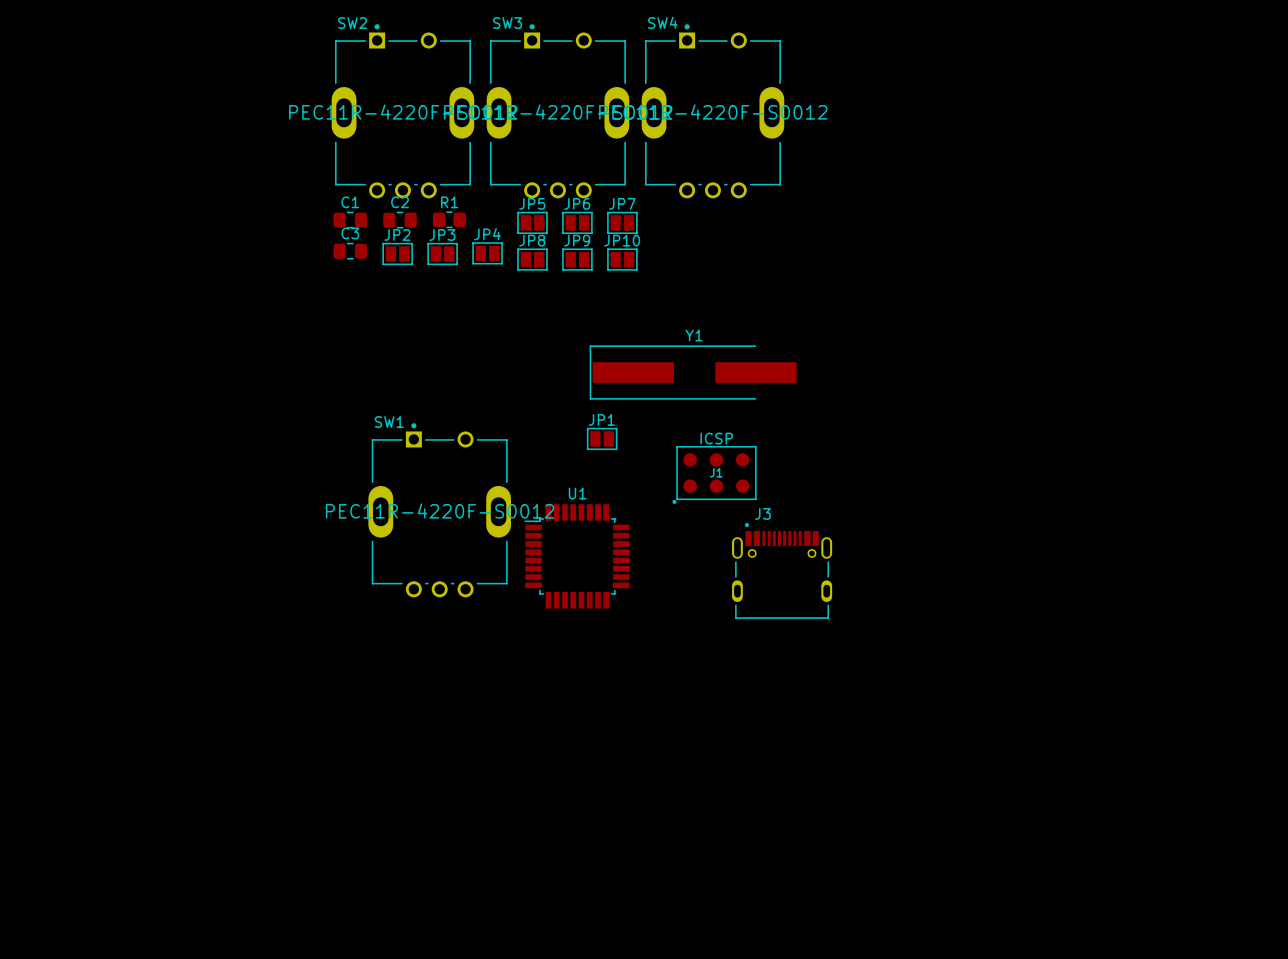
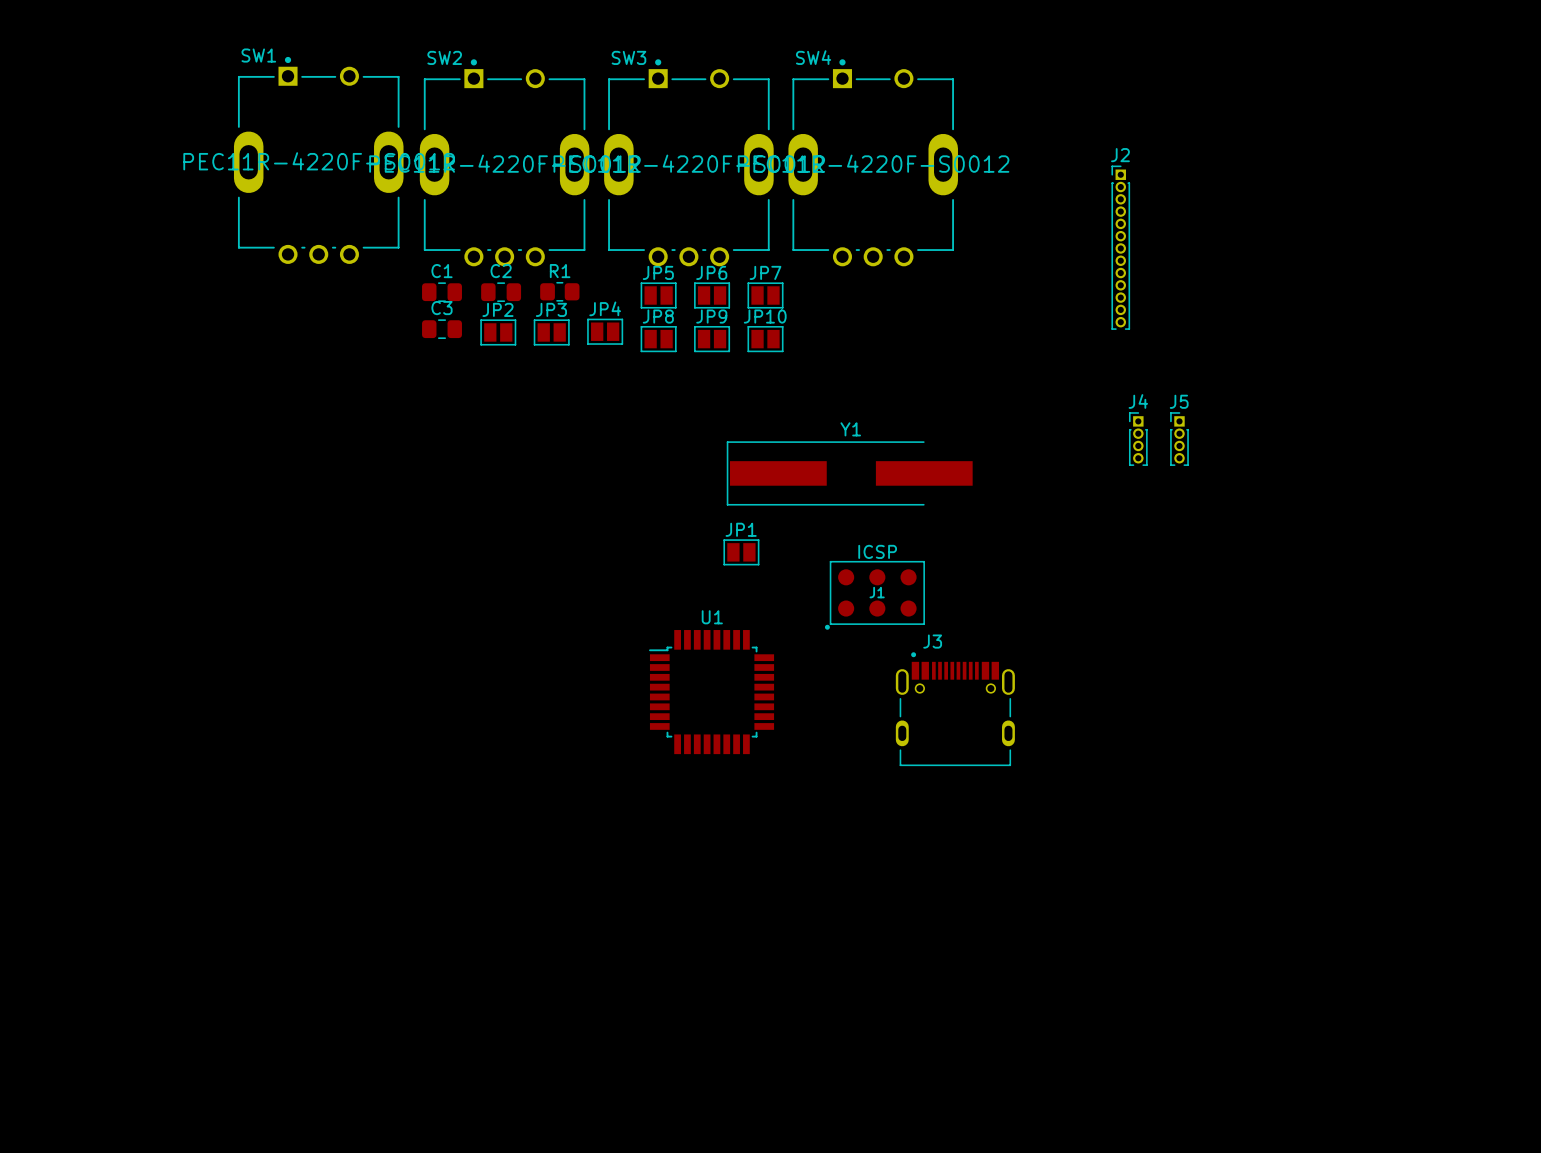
J2: none -> (1120, 247)
J4: none -> (1138, 439)
J5: none -> (1179, 439)
SW1 position: (439, 510) -> (318, 160)

